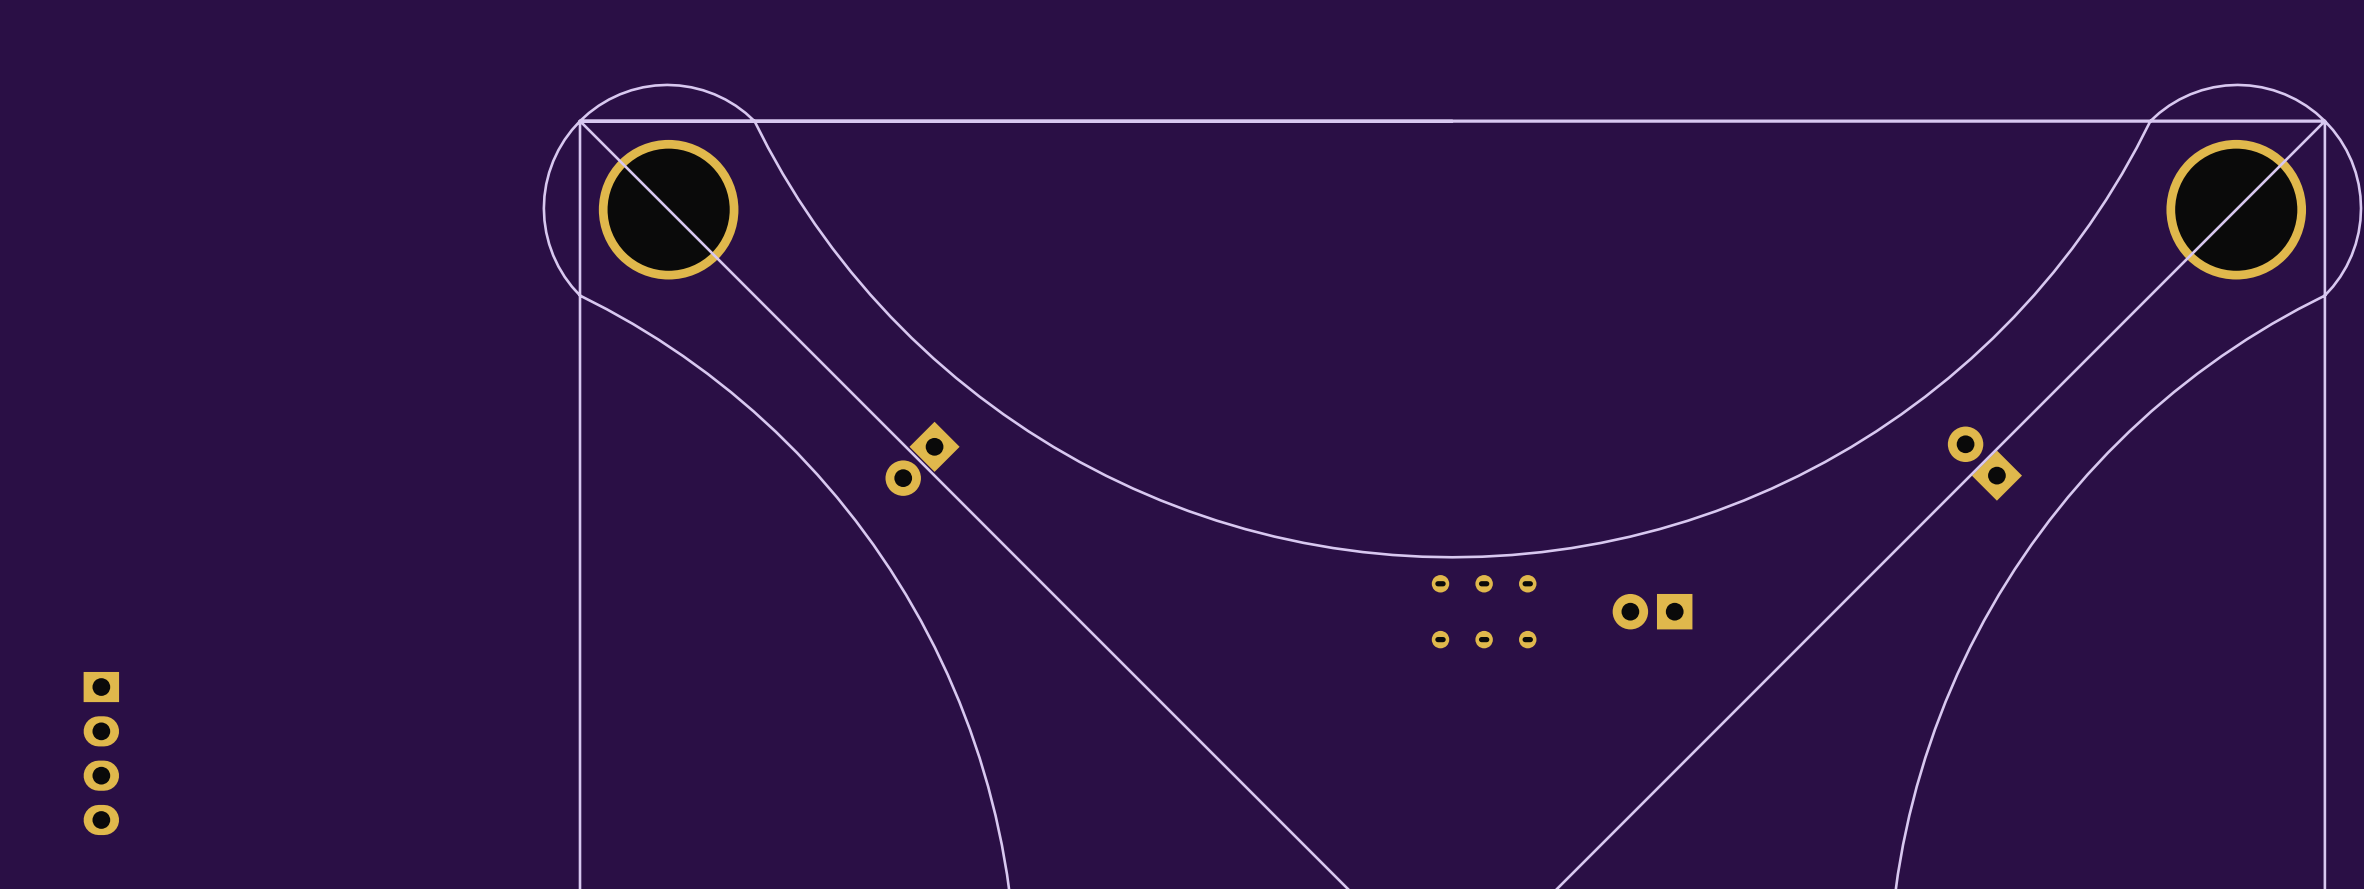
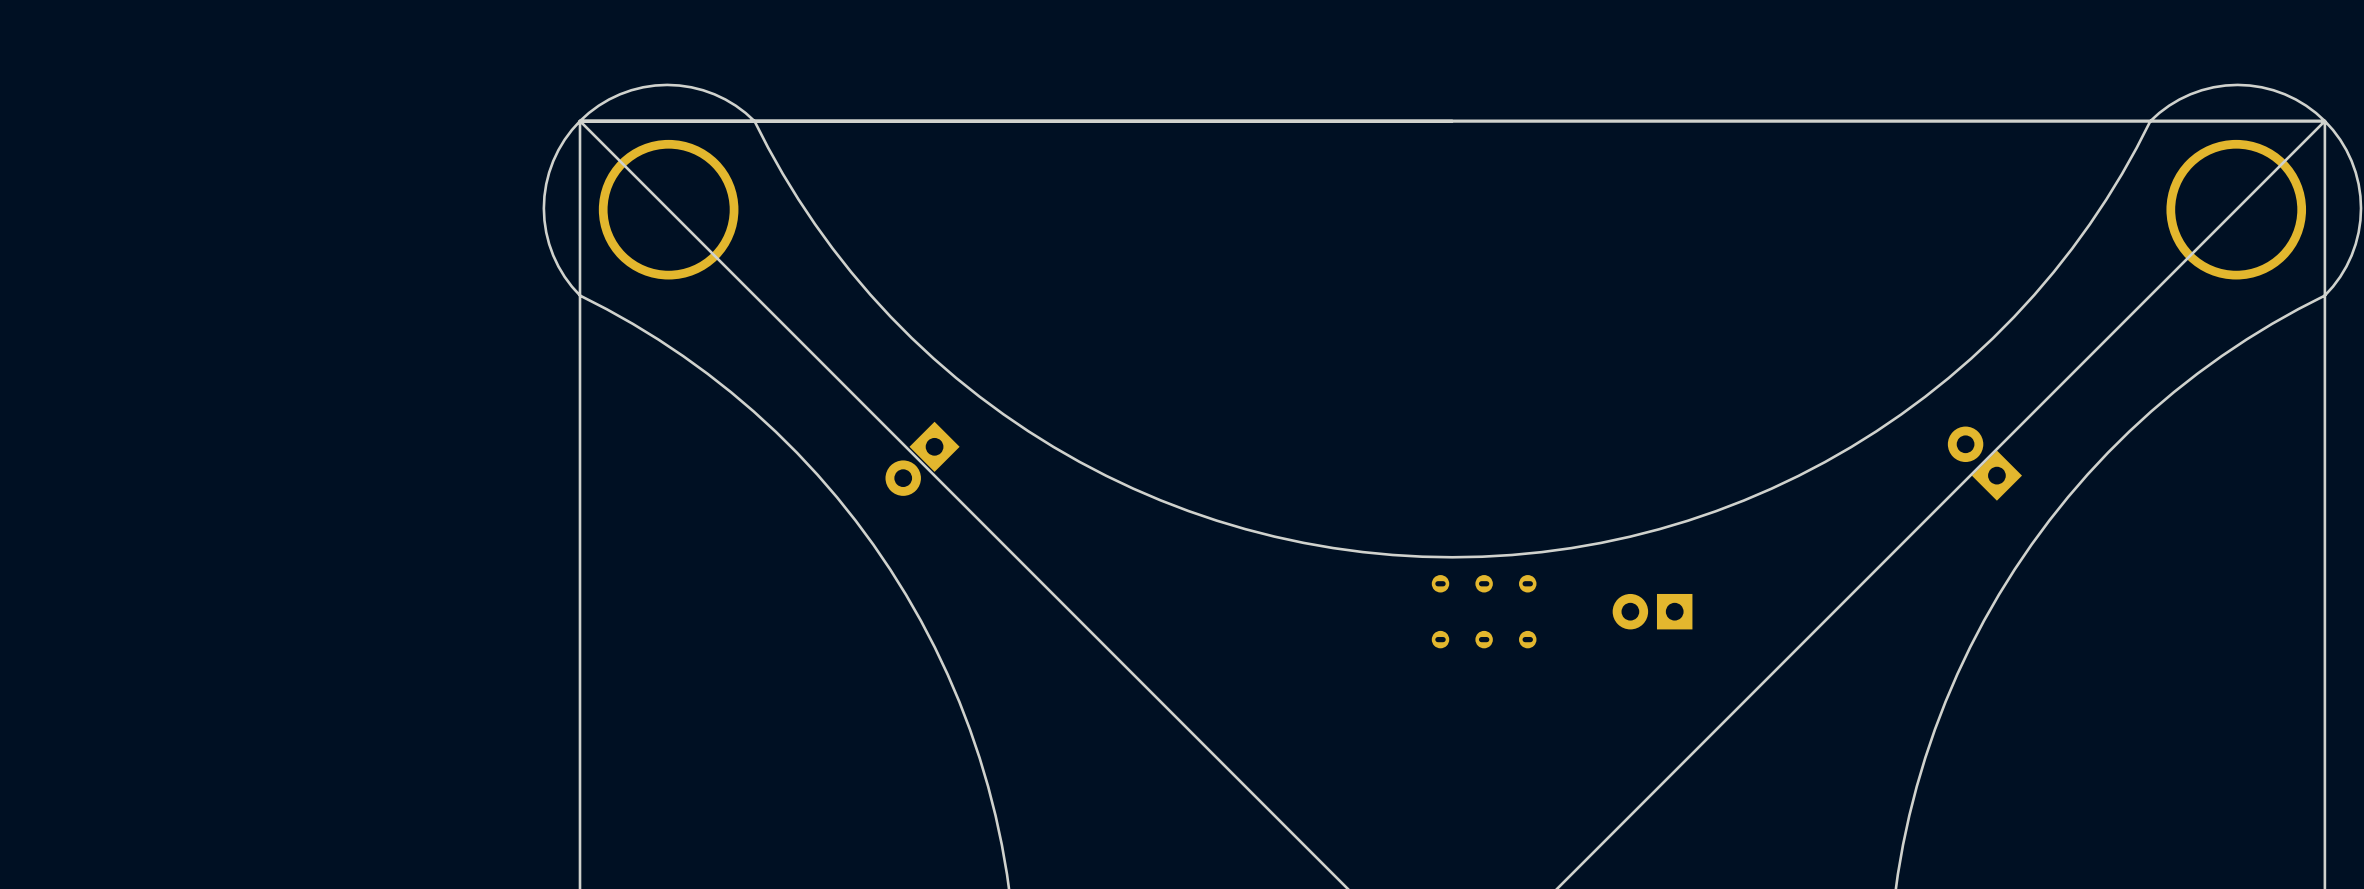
part: (101, 753) -> none

